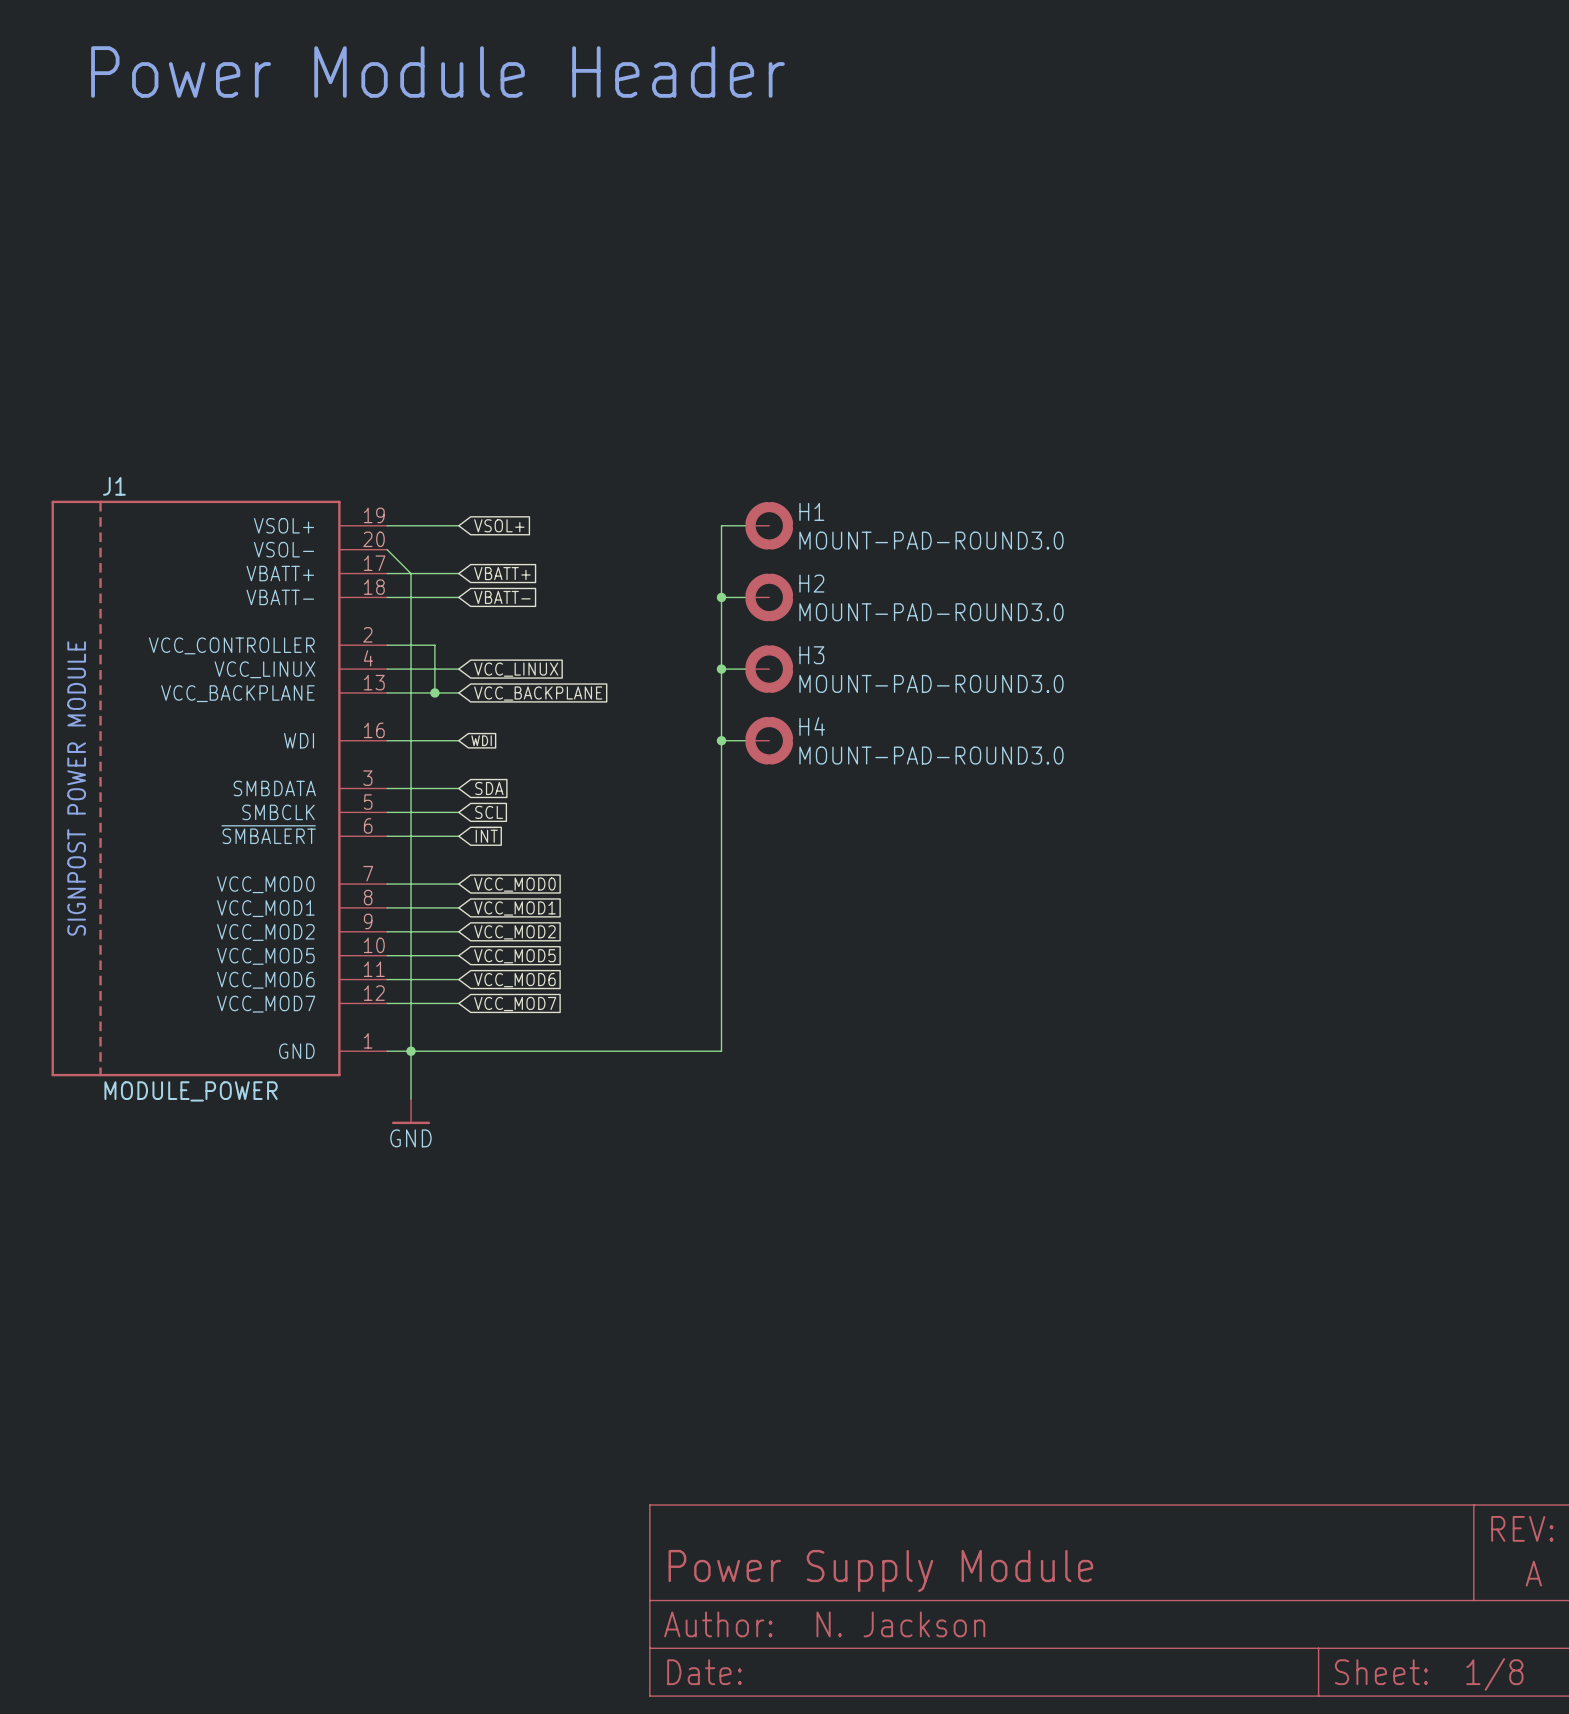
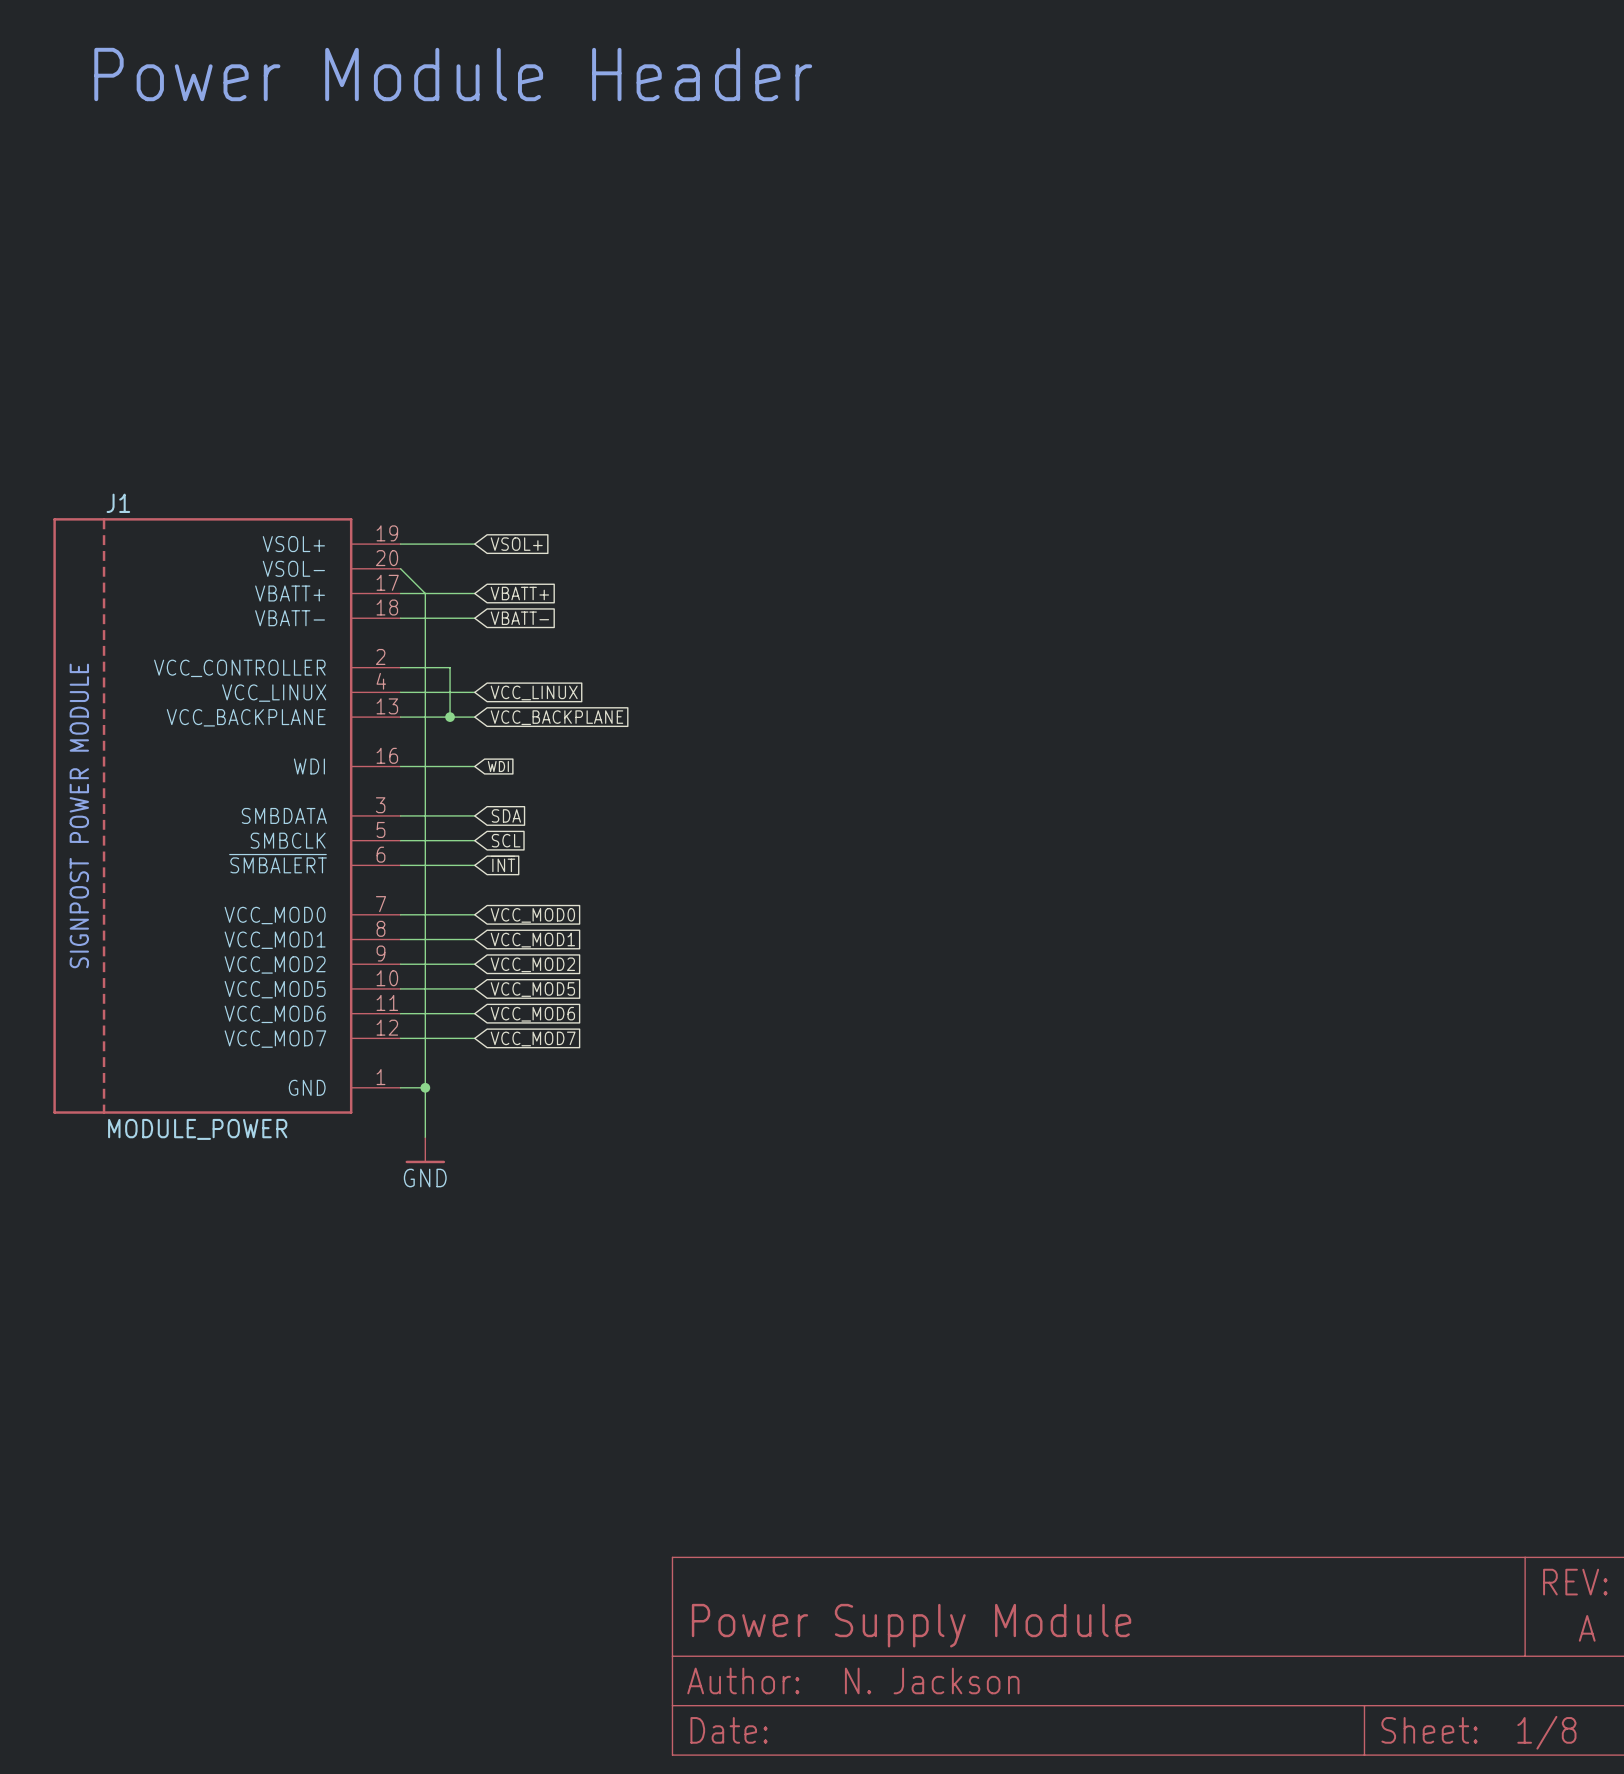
wire: (745, 525) (721, 525) (721, 1051) (411, 1051) -> none
H1: MOUNT-PAD-ROUND3.0 (769, 525) -> none
wire: (721, 597) (745, 597) -> none
junction: (721, 597) -> none
H2: MOUNT-PAD-ROUND3.0 (769, 597) -> none
wire: (721, 669) (745, 669) -> none
junction: (721, 669) -> none
H3: MOUNT-PAD-ROUND3.0 (769, 669) -> none
wire: (721, 740) (745, 740) -> none
junction: (721, 740) -> none
H4: MOUNT-PAD-ROUND3.0 (769, 740) -> none

